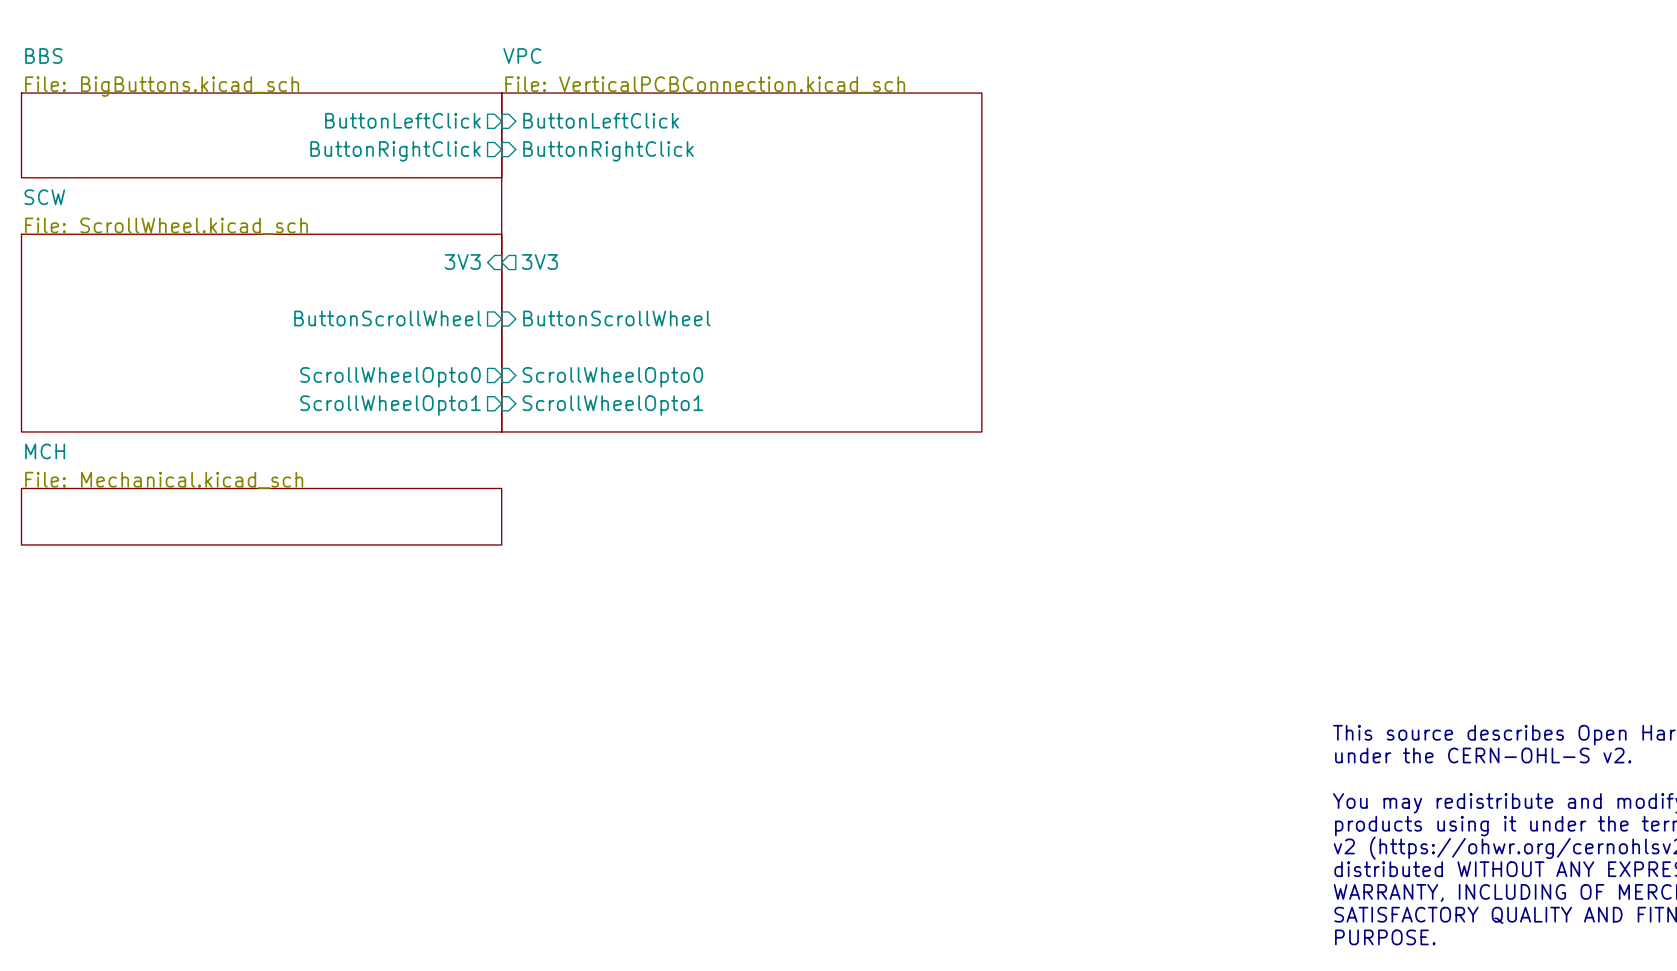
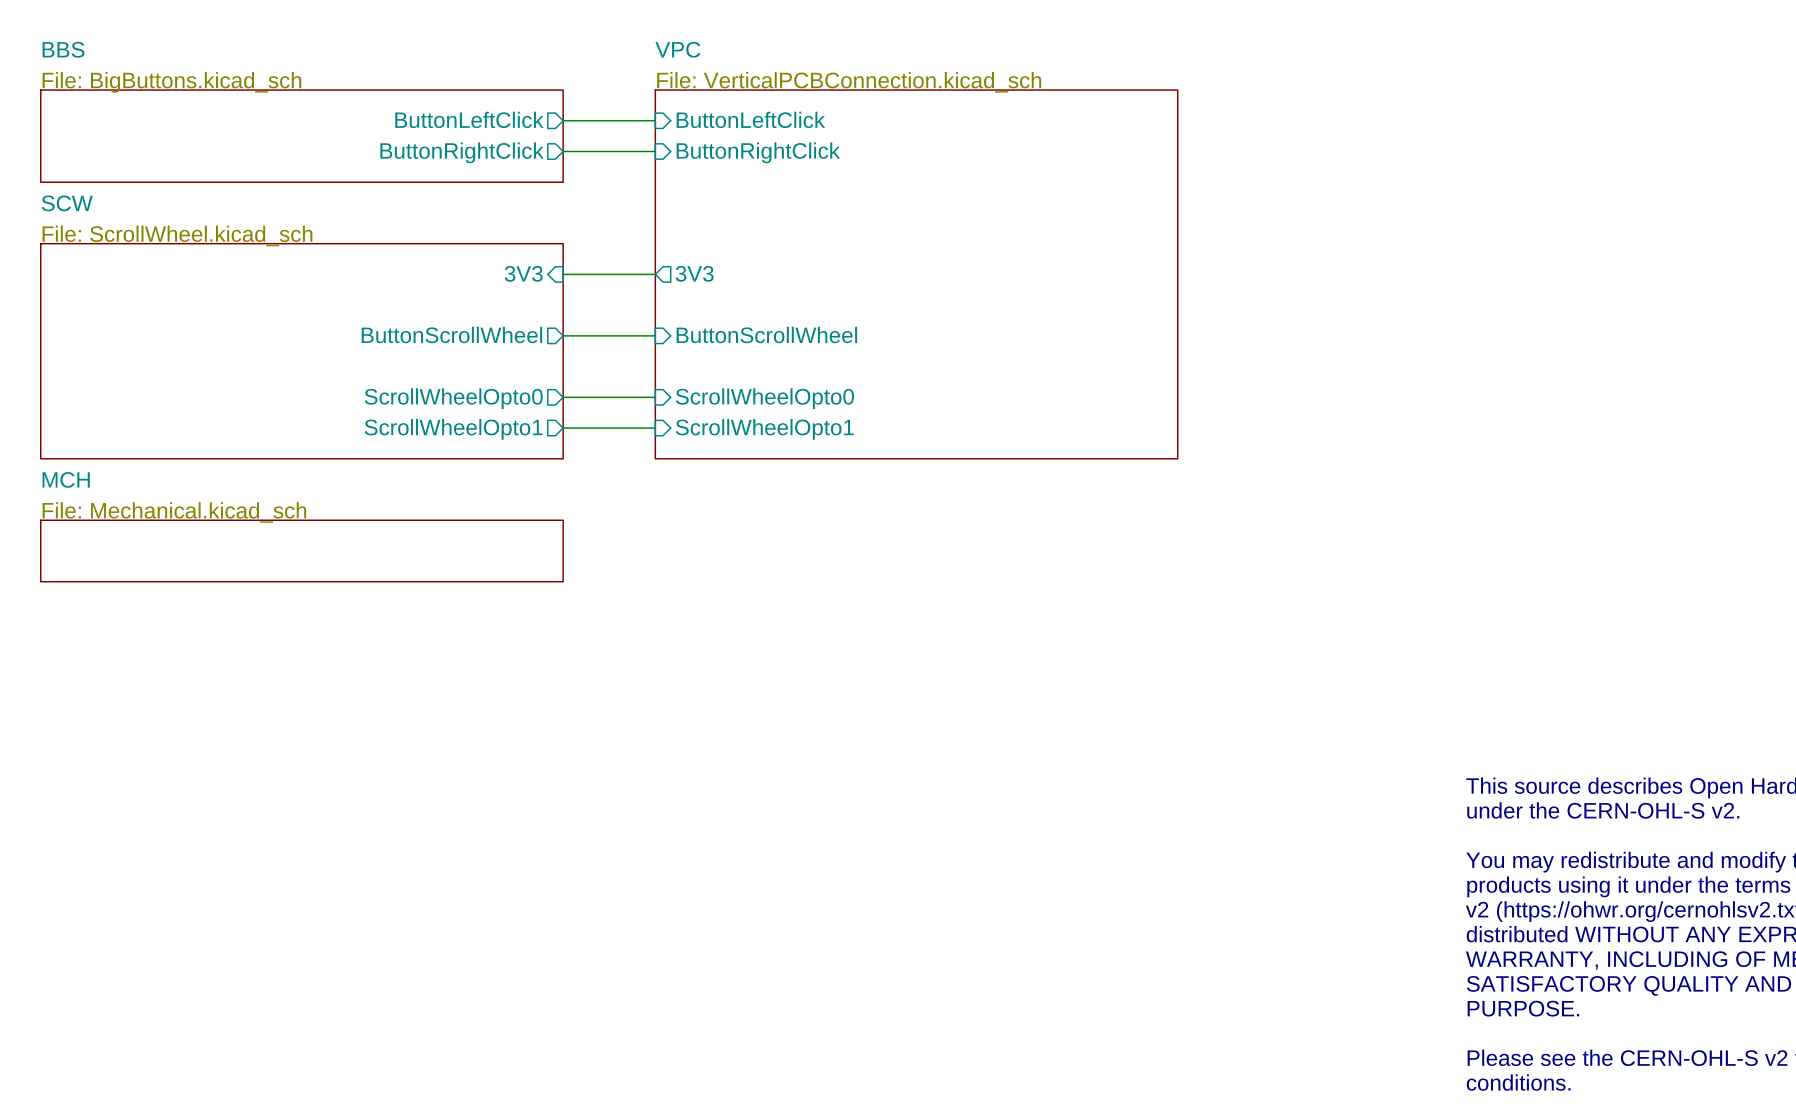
sheet pin position: ButtonLeftClick (601, 120) -> ButtonLeftClick (750, 119)
wire: none -> (563, 120) (655, 120)
wire: none -> (563, 151) (655, 151)
sheet pin position: ButtonRightClick (608, 151) -> ButtonRightClick (758, 152)
sheet pin position: 3V3 (539, 261) -> 3V3 (694, 273)
wire: none -> (563, 274) (655, 274)
sheet VPC position: (741, 262) -> (916, 274)
sheet pin position: ButtonScrollWheel (616, 318) -> ButtonScrollWheel (766, 335)
wire: none -> (563, 335) (655, 335)
wire: none -> (563, 397) (655, 397)
sheet pin position: ScrollWheelOpto0 (612, 377) -> ScrollWheelOpto0 (764, 398)
wire: none -> (563, 428) (655, 428)
sheet pin position: ScrollWheelOpto1 (612, 405) -> ScrollWheelOpto1 (764, 429)

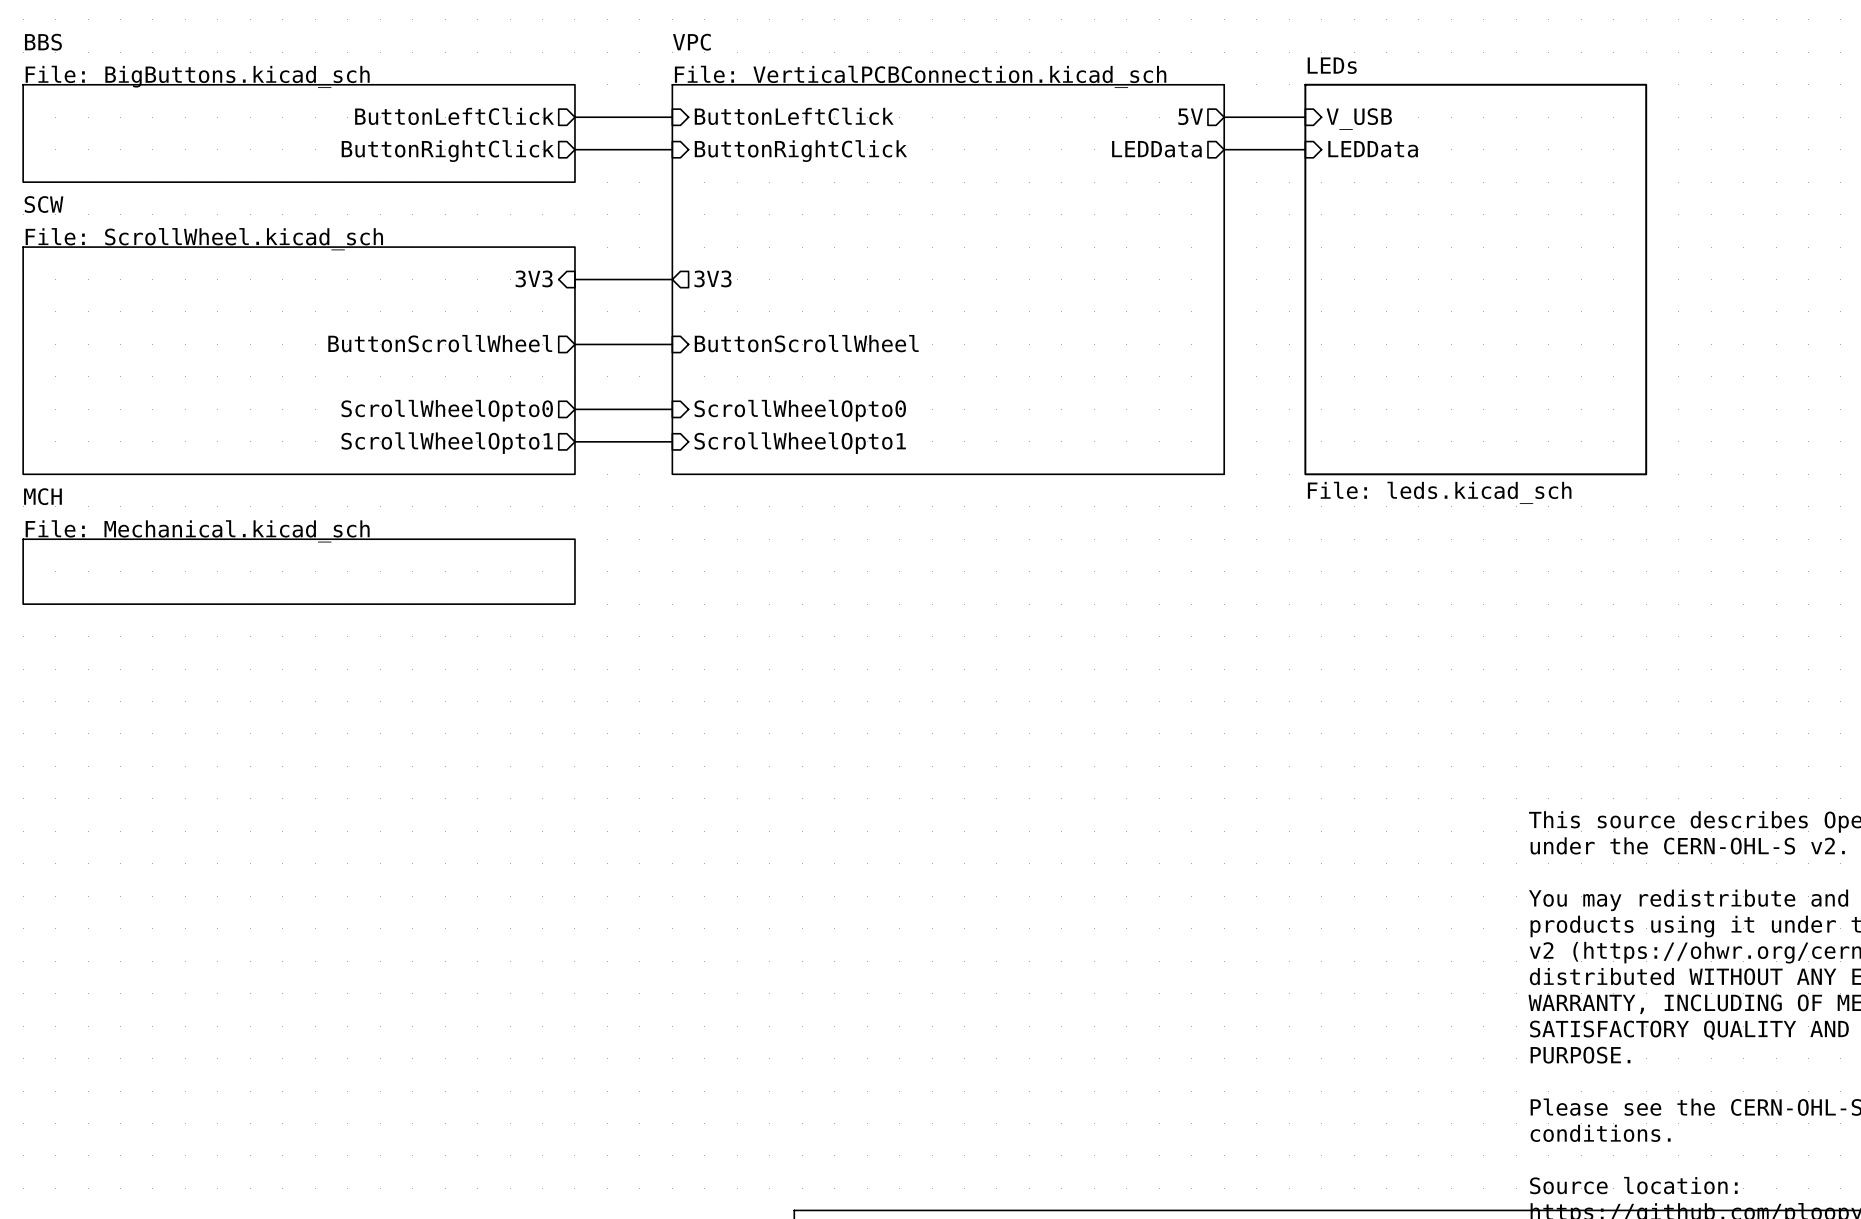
sheet pin: none -> 5V (1190, 116)
wire: none -> (1224, 117) (1305, 117)
sheet pin: none -> V_USB (1359, 119)
sheet pin: none -> LEDData (1156, 149)
wire: none -> (1224, 149) (1305, 149)
sheet pin: none -> LEDData (1373, 149)
sheet LEDs: none -> File: leds.kicad_sch (1475, 279)

